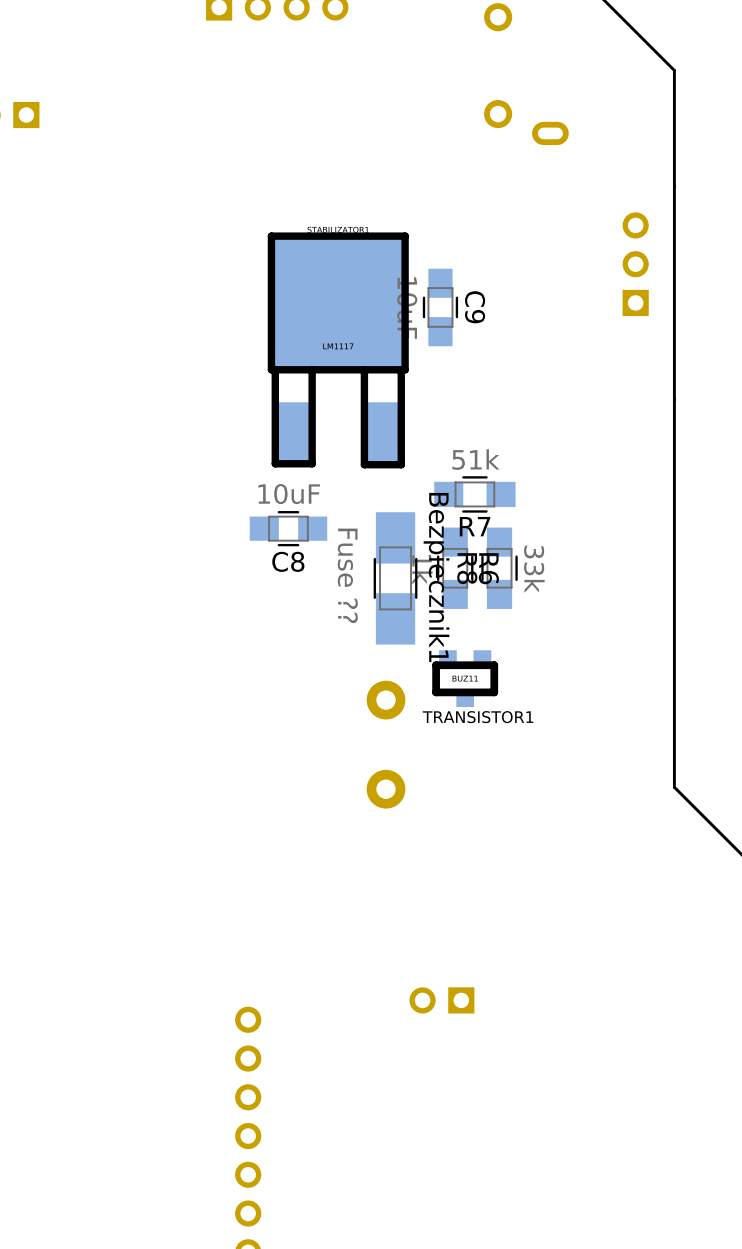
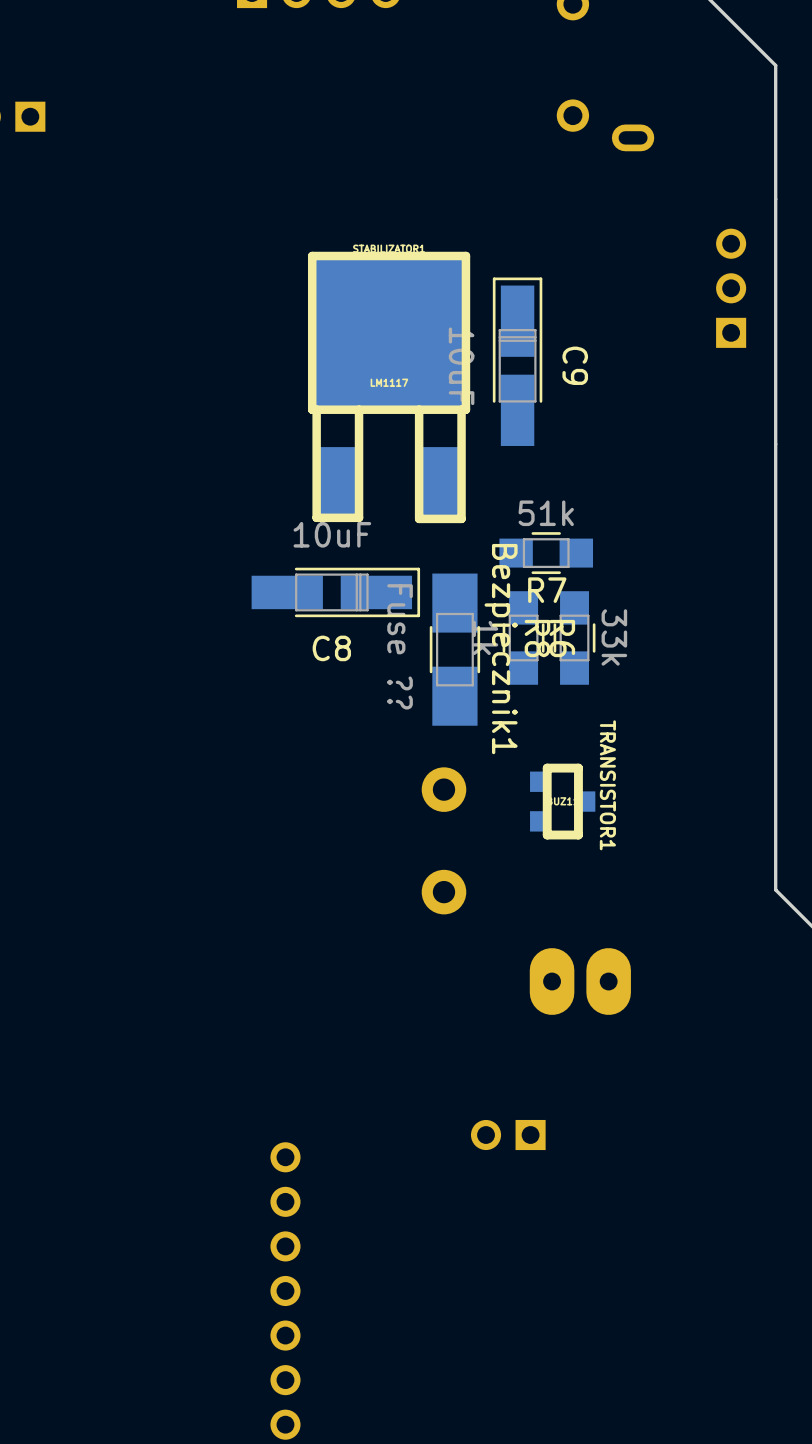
C9 footprint: [422, 268, 459, 347] -> [492, 277, 543, 446]
C8 footprint: [249, 511, 328, 547] -> [251, 567, 421, 618]
TRANSISTOR1 rotation: 0° (465, 678) -> 90° counterclockwise (562, 801)
TRANSISTOR1 position: (465, 678) -> (562, 801)
part: none -> (580, 981)

